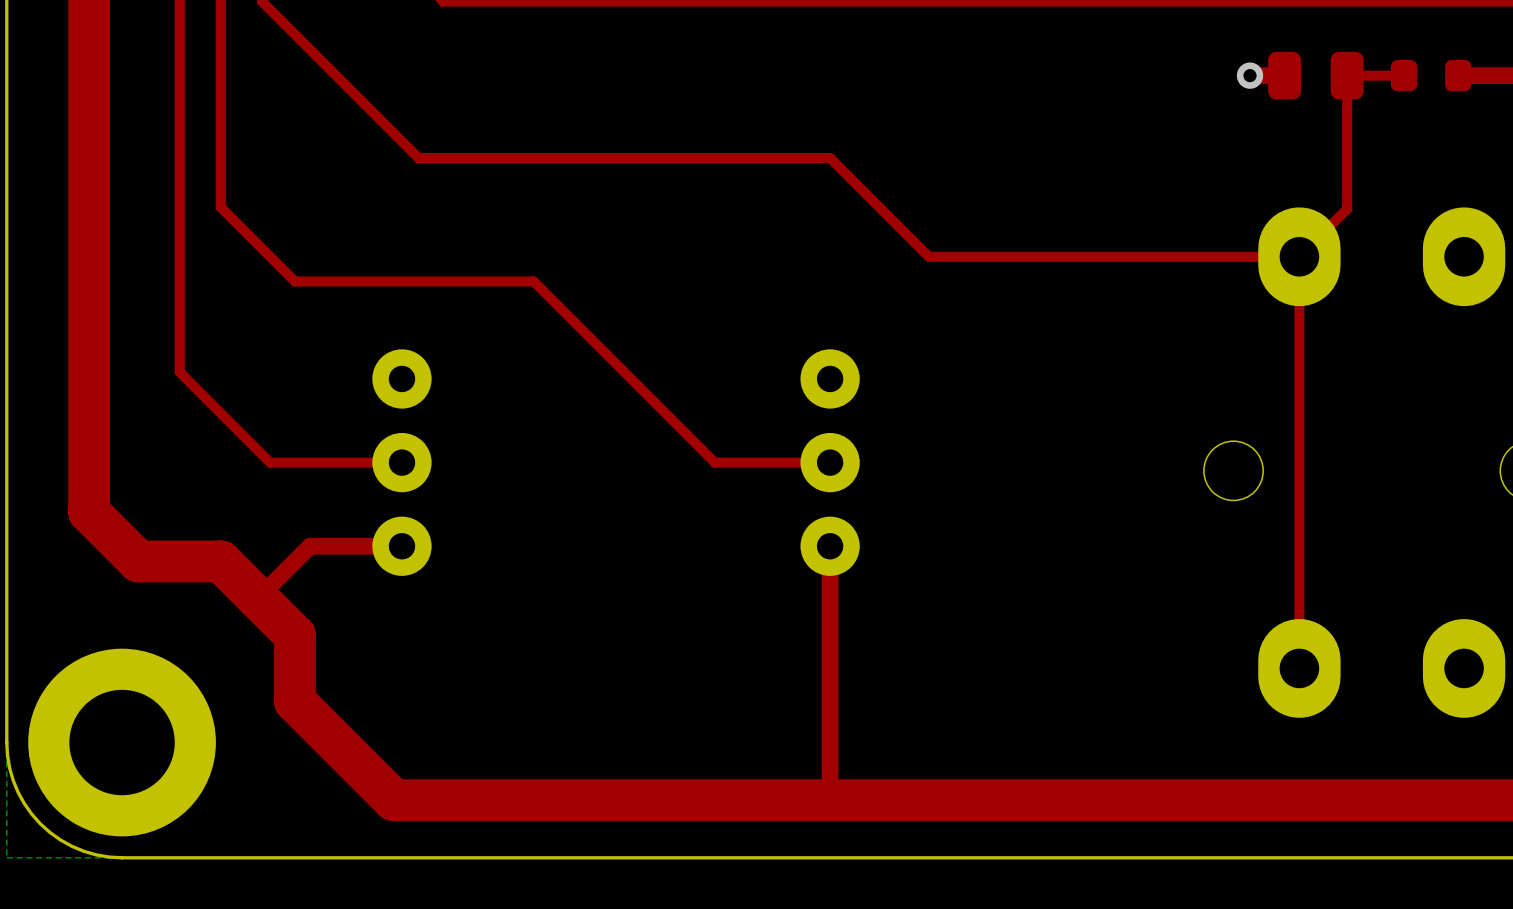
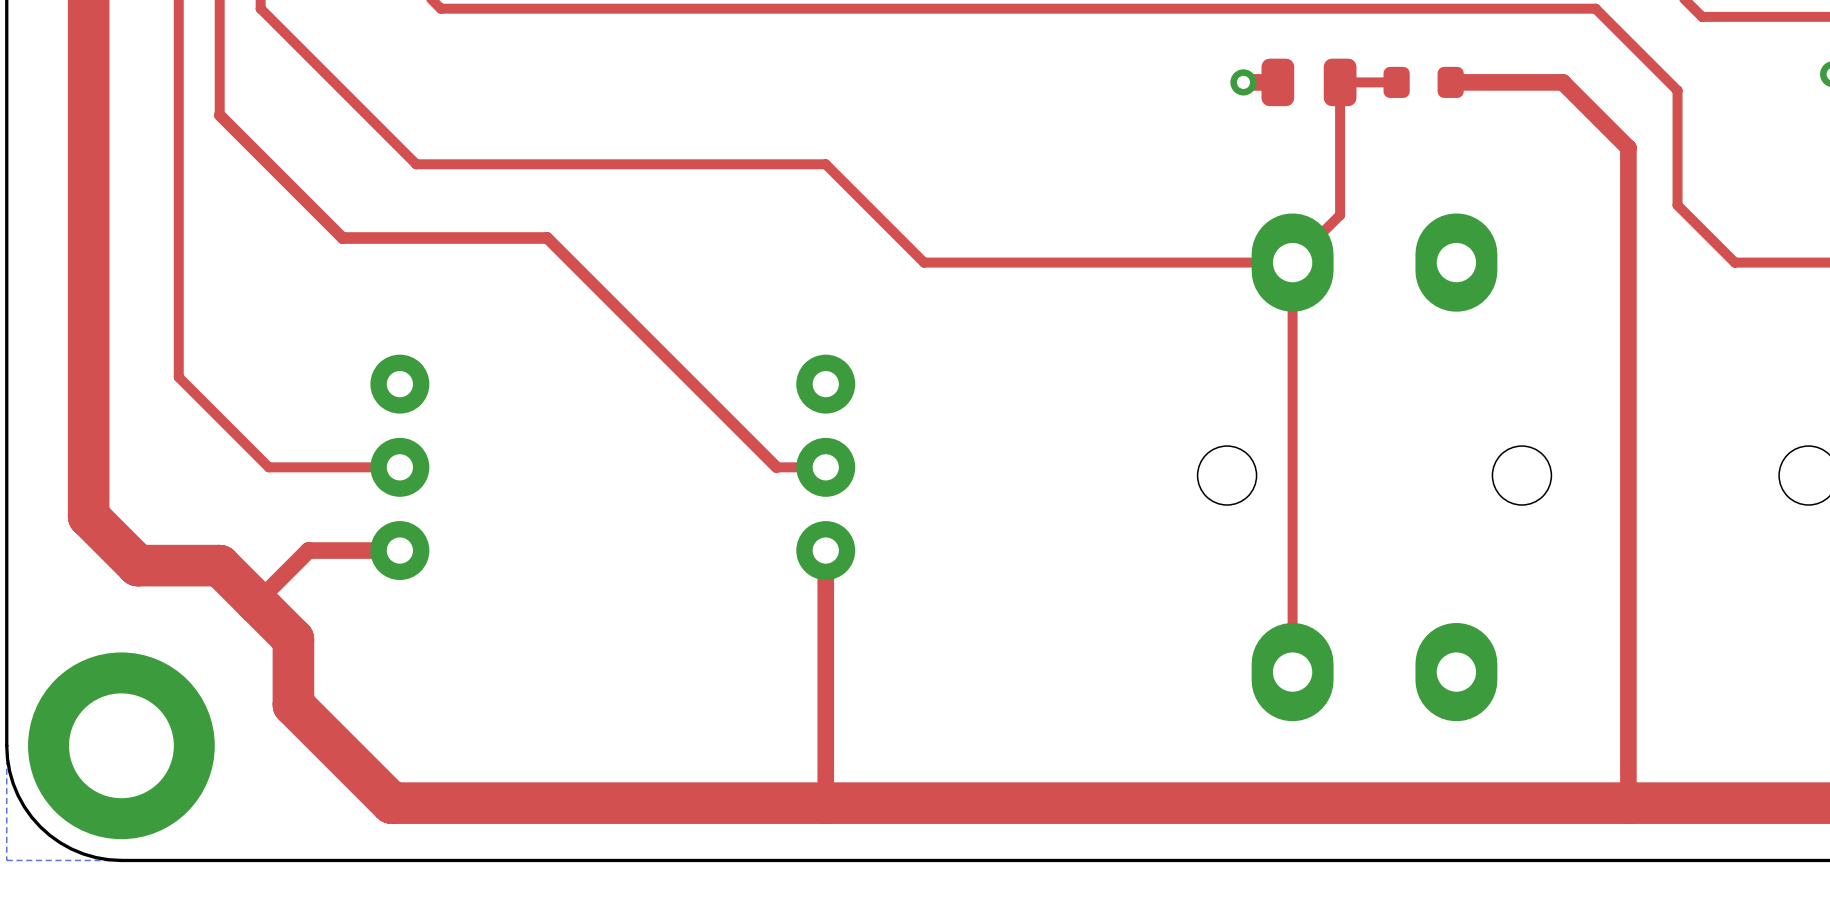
top track: (220, 108) (220, 207) (294, 281) (533, 281) (714, 462) (780, 462) -> (219, 115) (342, 238) (547, 238) (776, 467)

